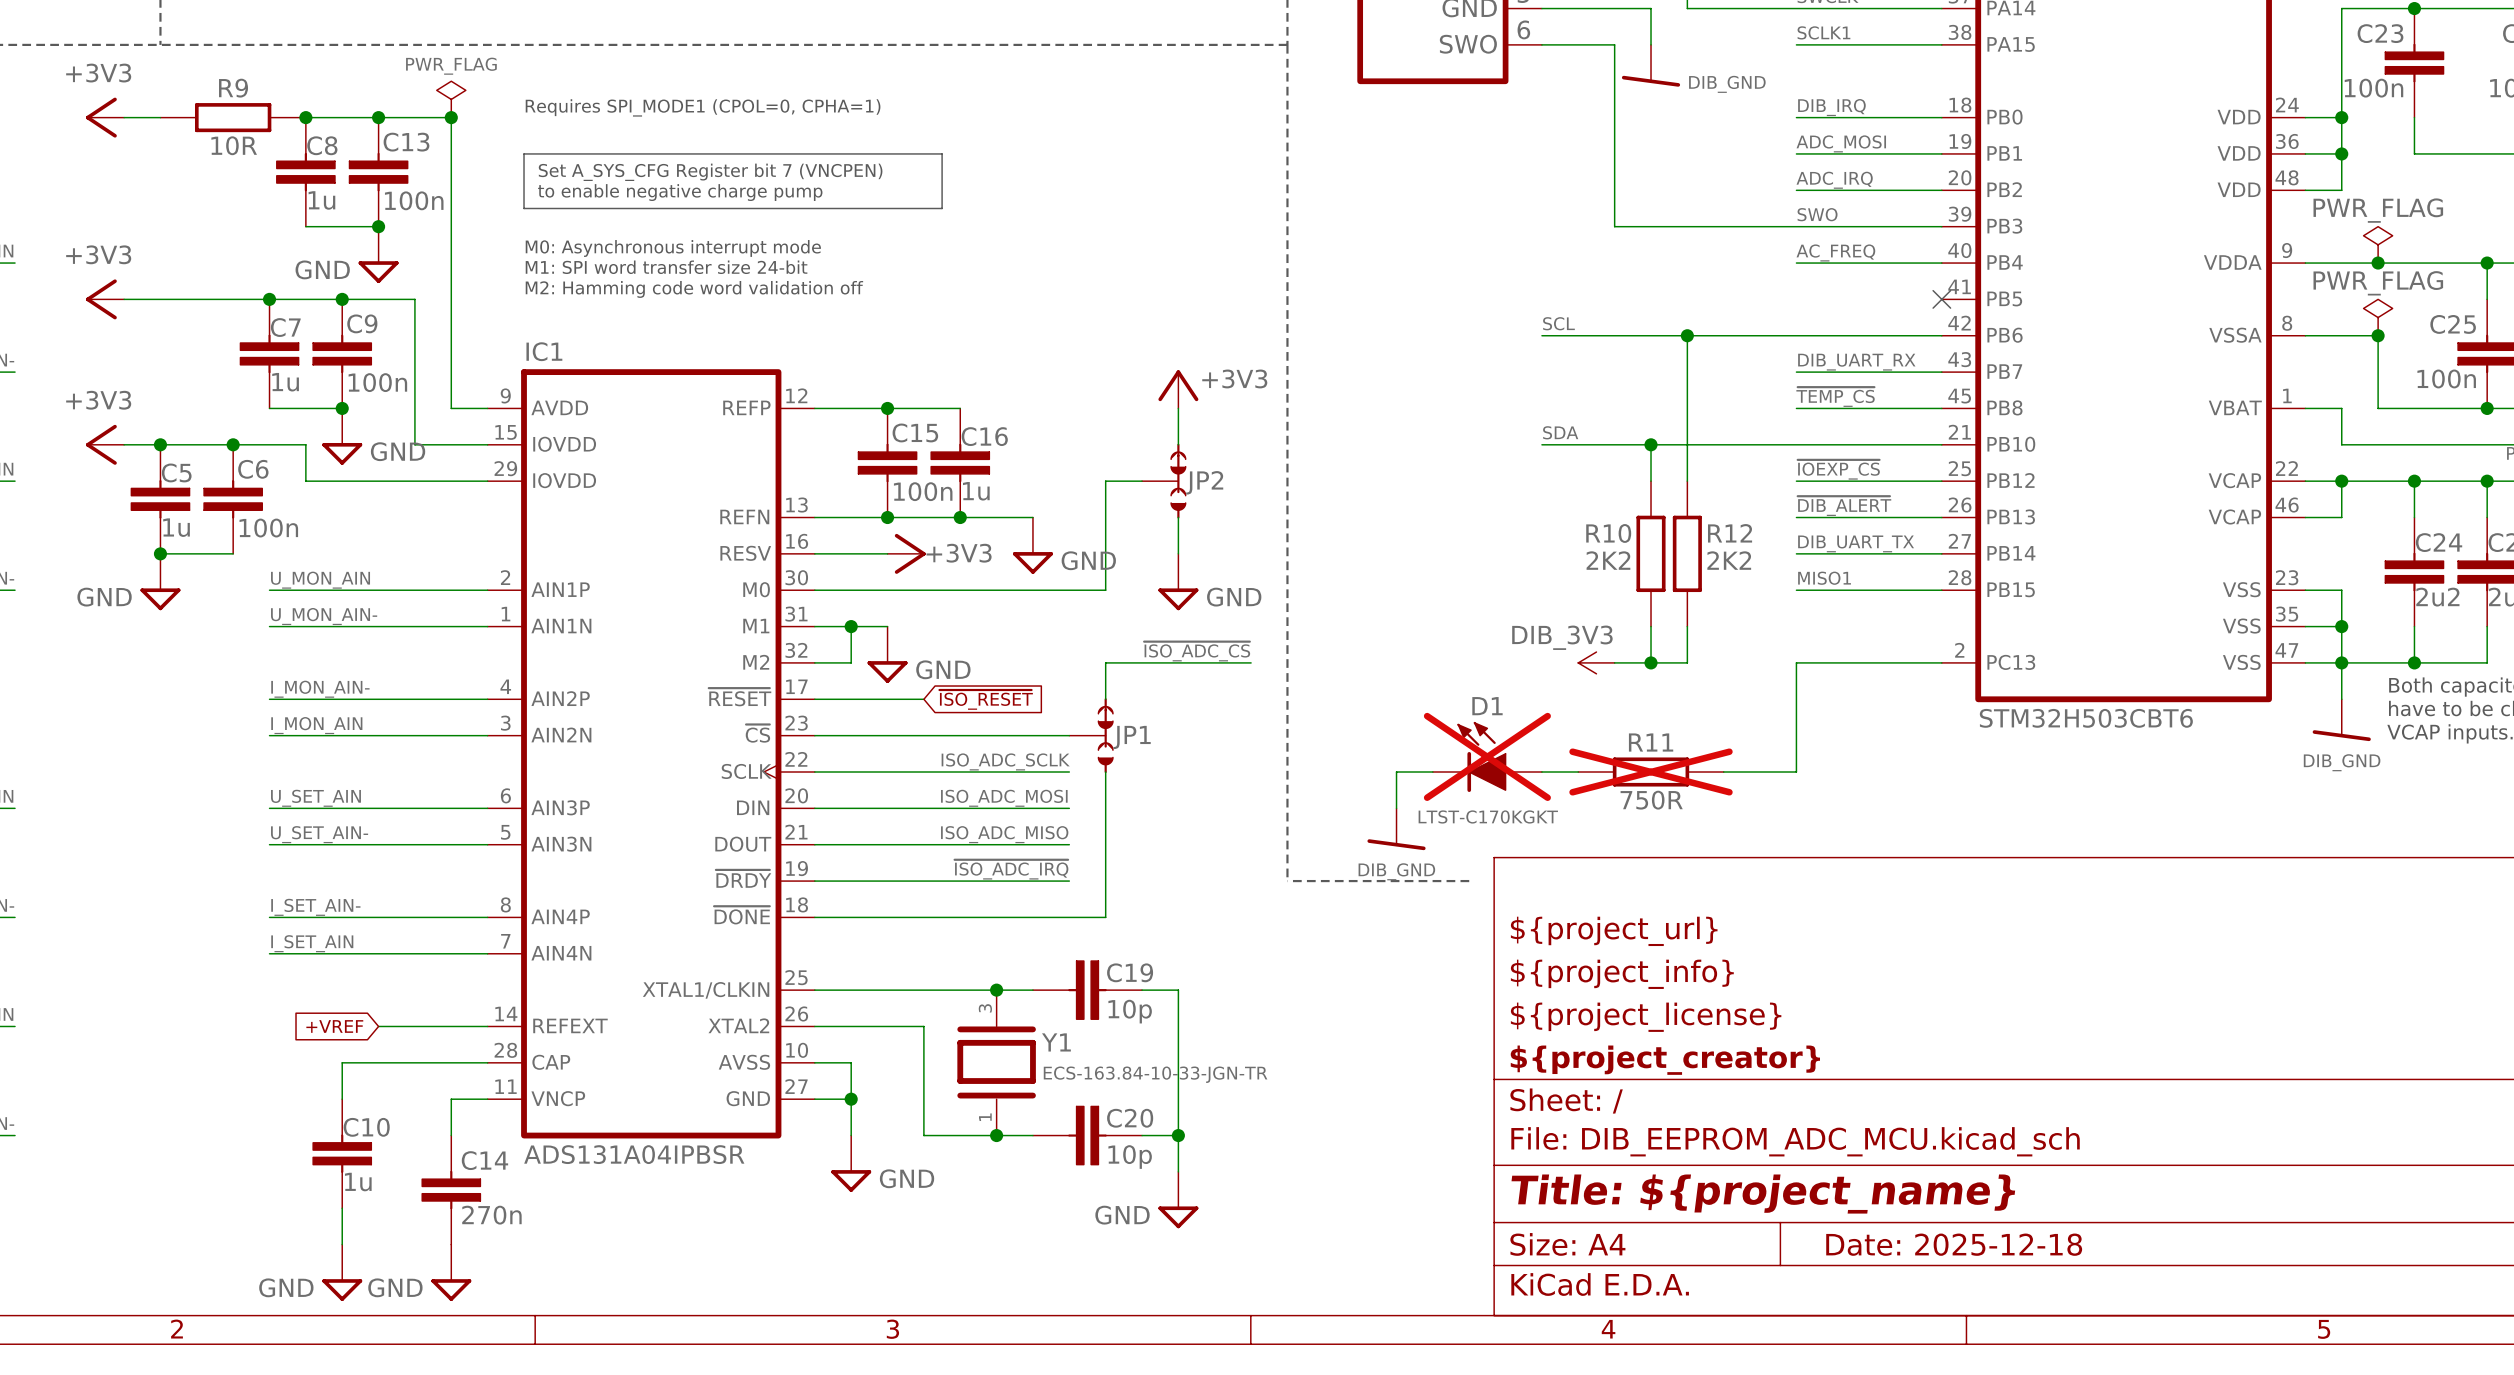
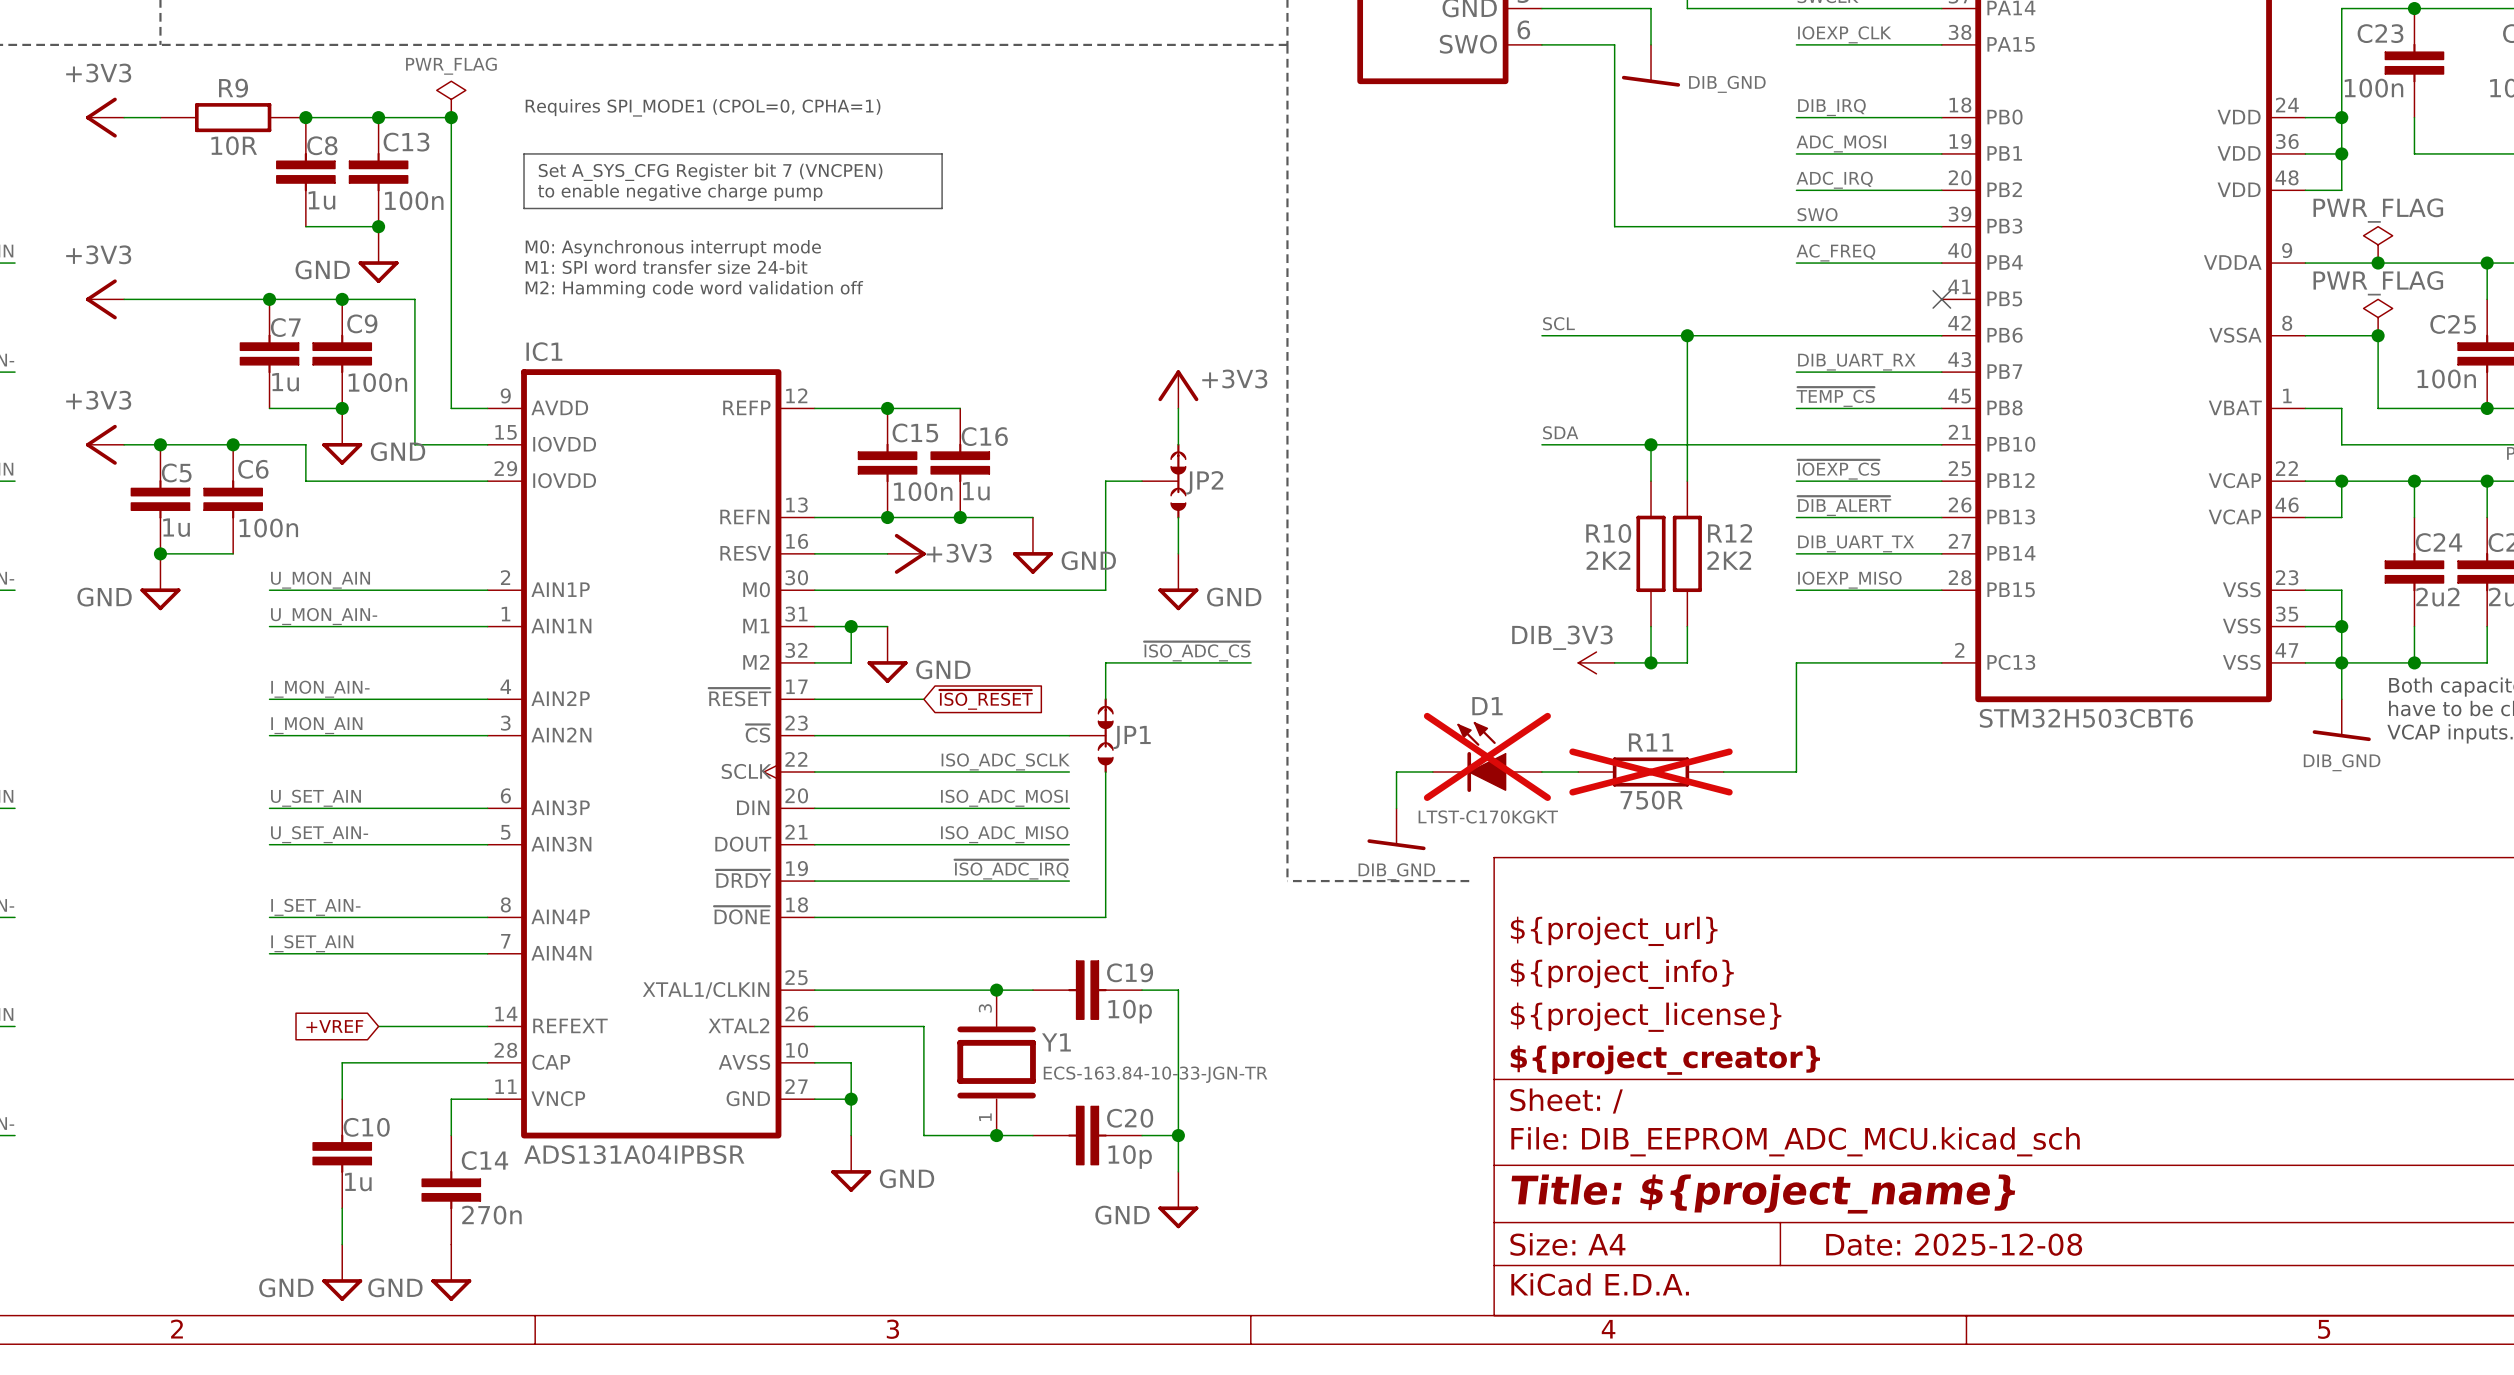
label: SCLK1 (1823, 32) -> IOEXP_CLK (1844, 34)
label: MISO1 (1824, 578) -> IOEXP_MISO (1849, 580)
title block: Date: 2025-12-18 (1954, 1244) -> Date: 2025-12-08 (1954, 1244)

